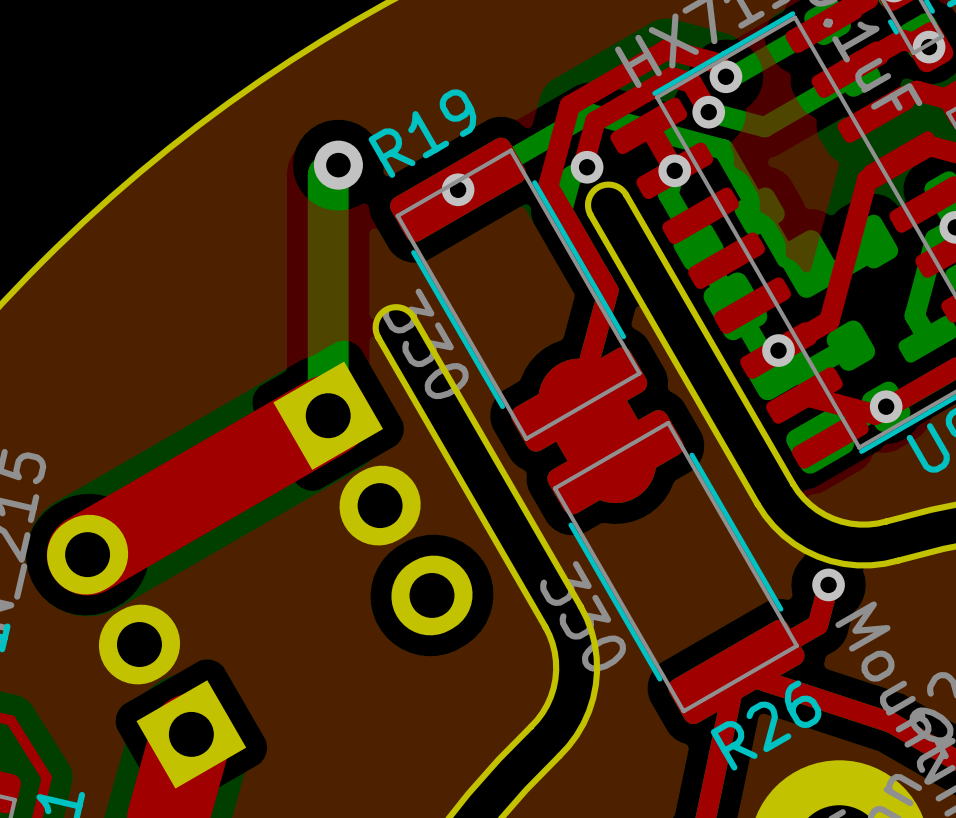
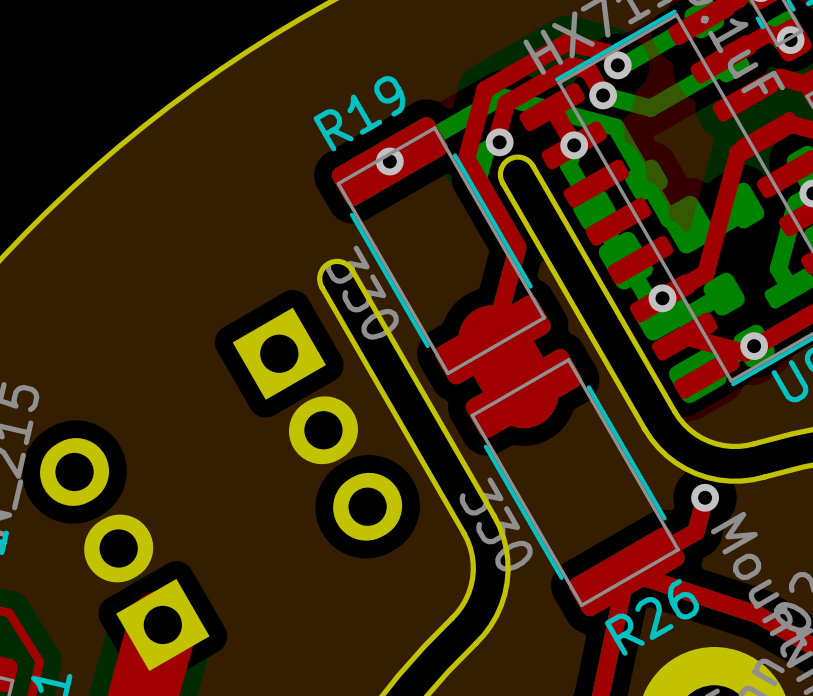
bottom track: (338, 165) (328, 175) (328, 415) -> none
via: (338, 165) -> none
top track: (328, 415) (87, 554) -> none

